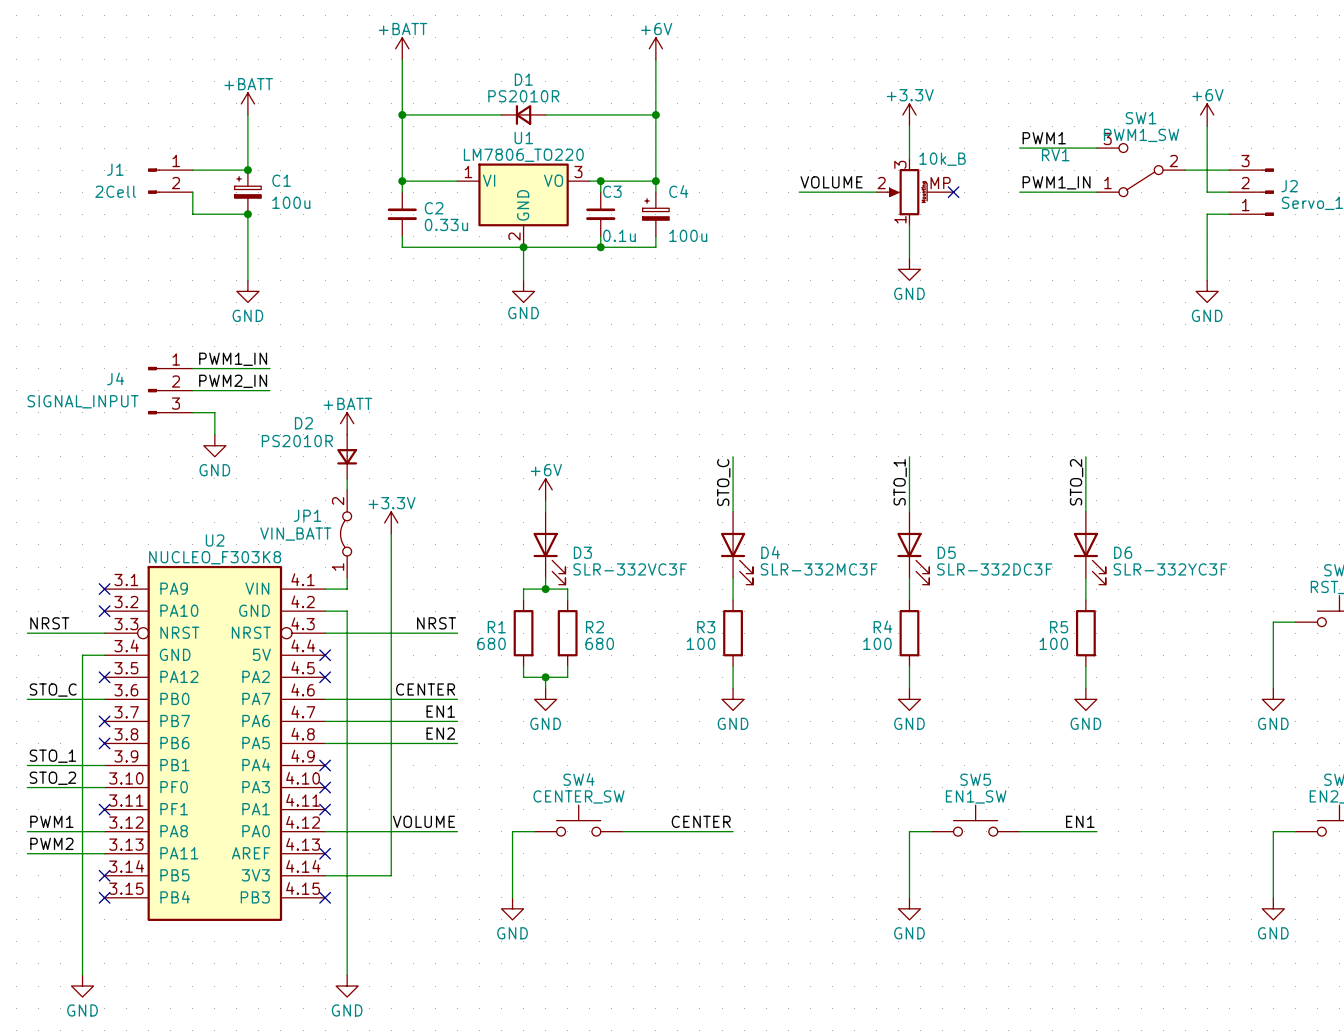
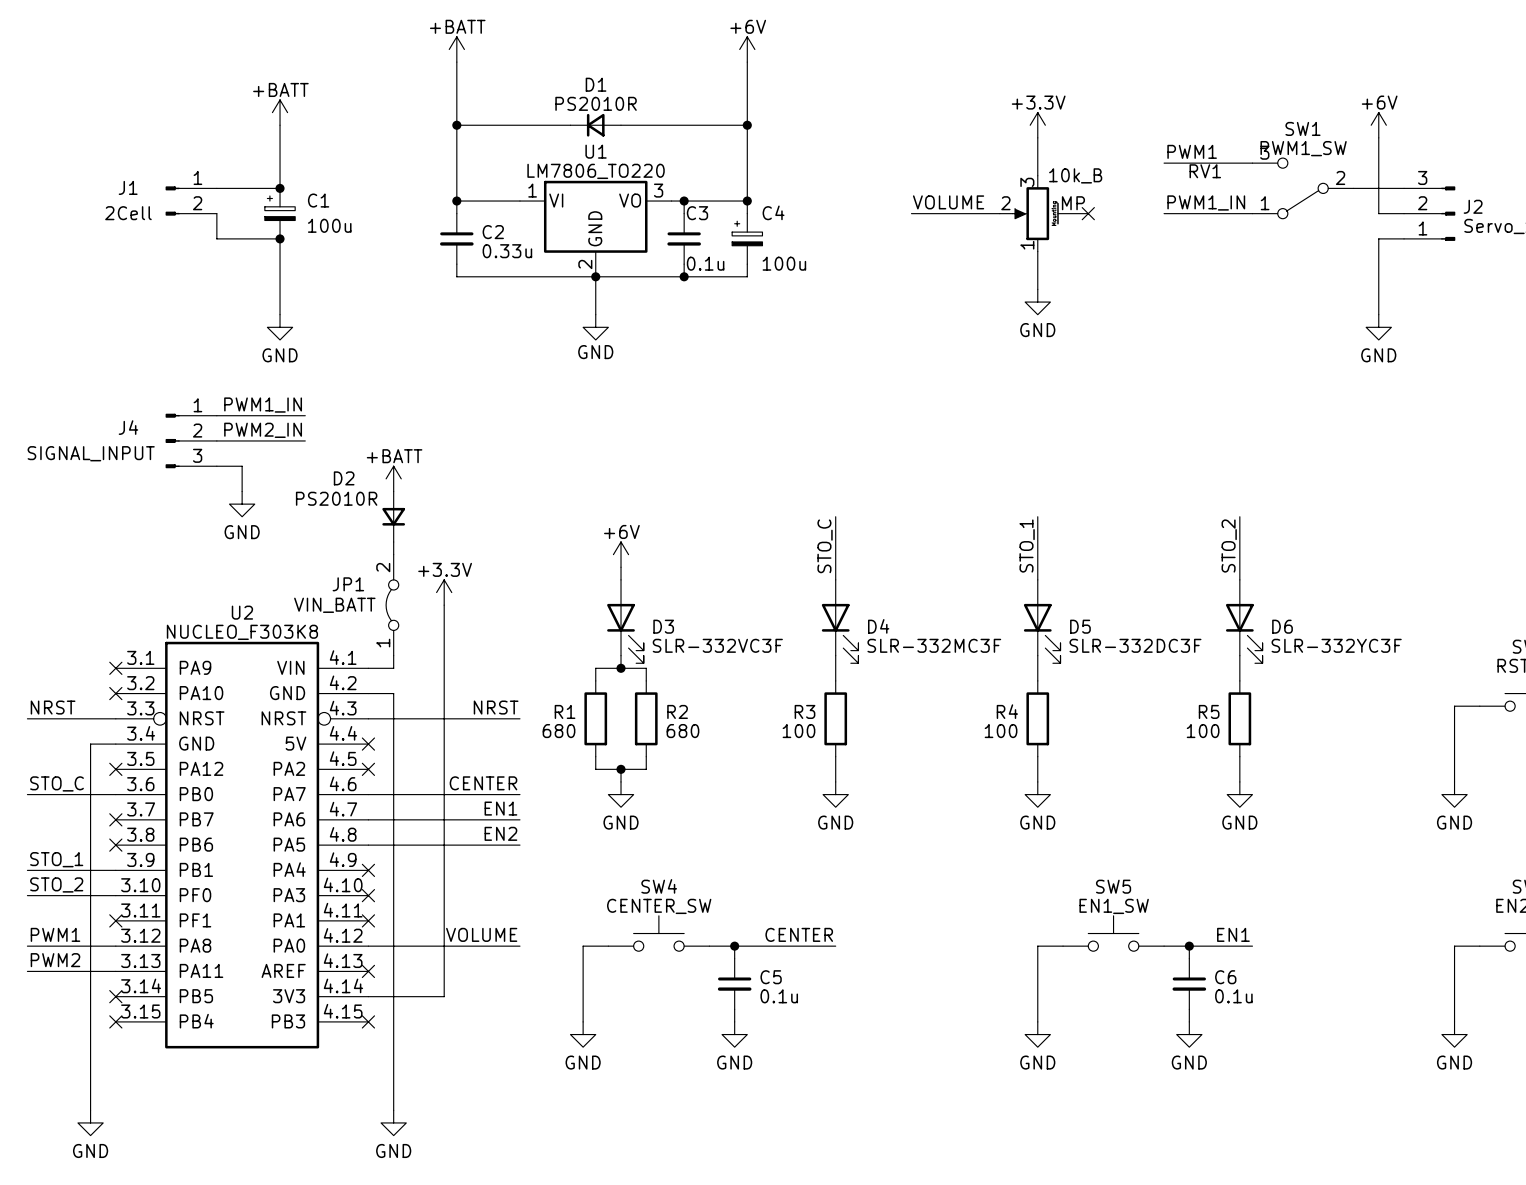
wire: none -> (734, 946) (734, 958)
junction: none -> (734, 946)
wire: none -> (1189, 946) (1189, 958)
junction: none -> (1189, 946)
C5: none -> 0.1u (734, 984)
C6: none -> 0.1u (1189, 984)
wire: none -> (734, 1009) (734, 1021)
wire: none -> (1189, 1009) (1189, 1021)
power symbol: none -> GND (734, 1034)
power symbol: none -> GND (1189, 1034)

